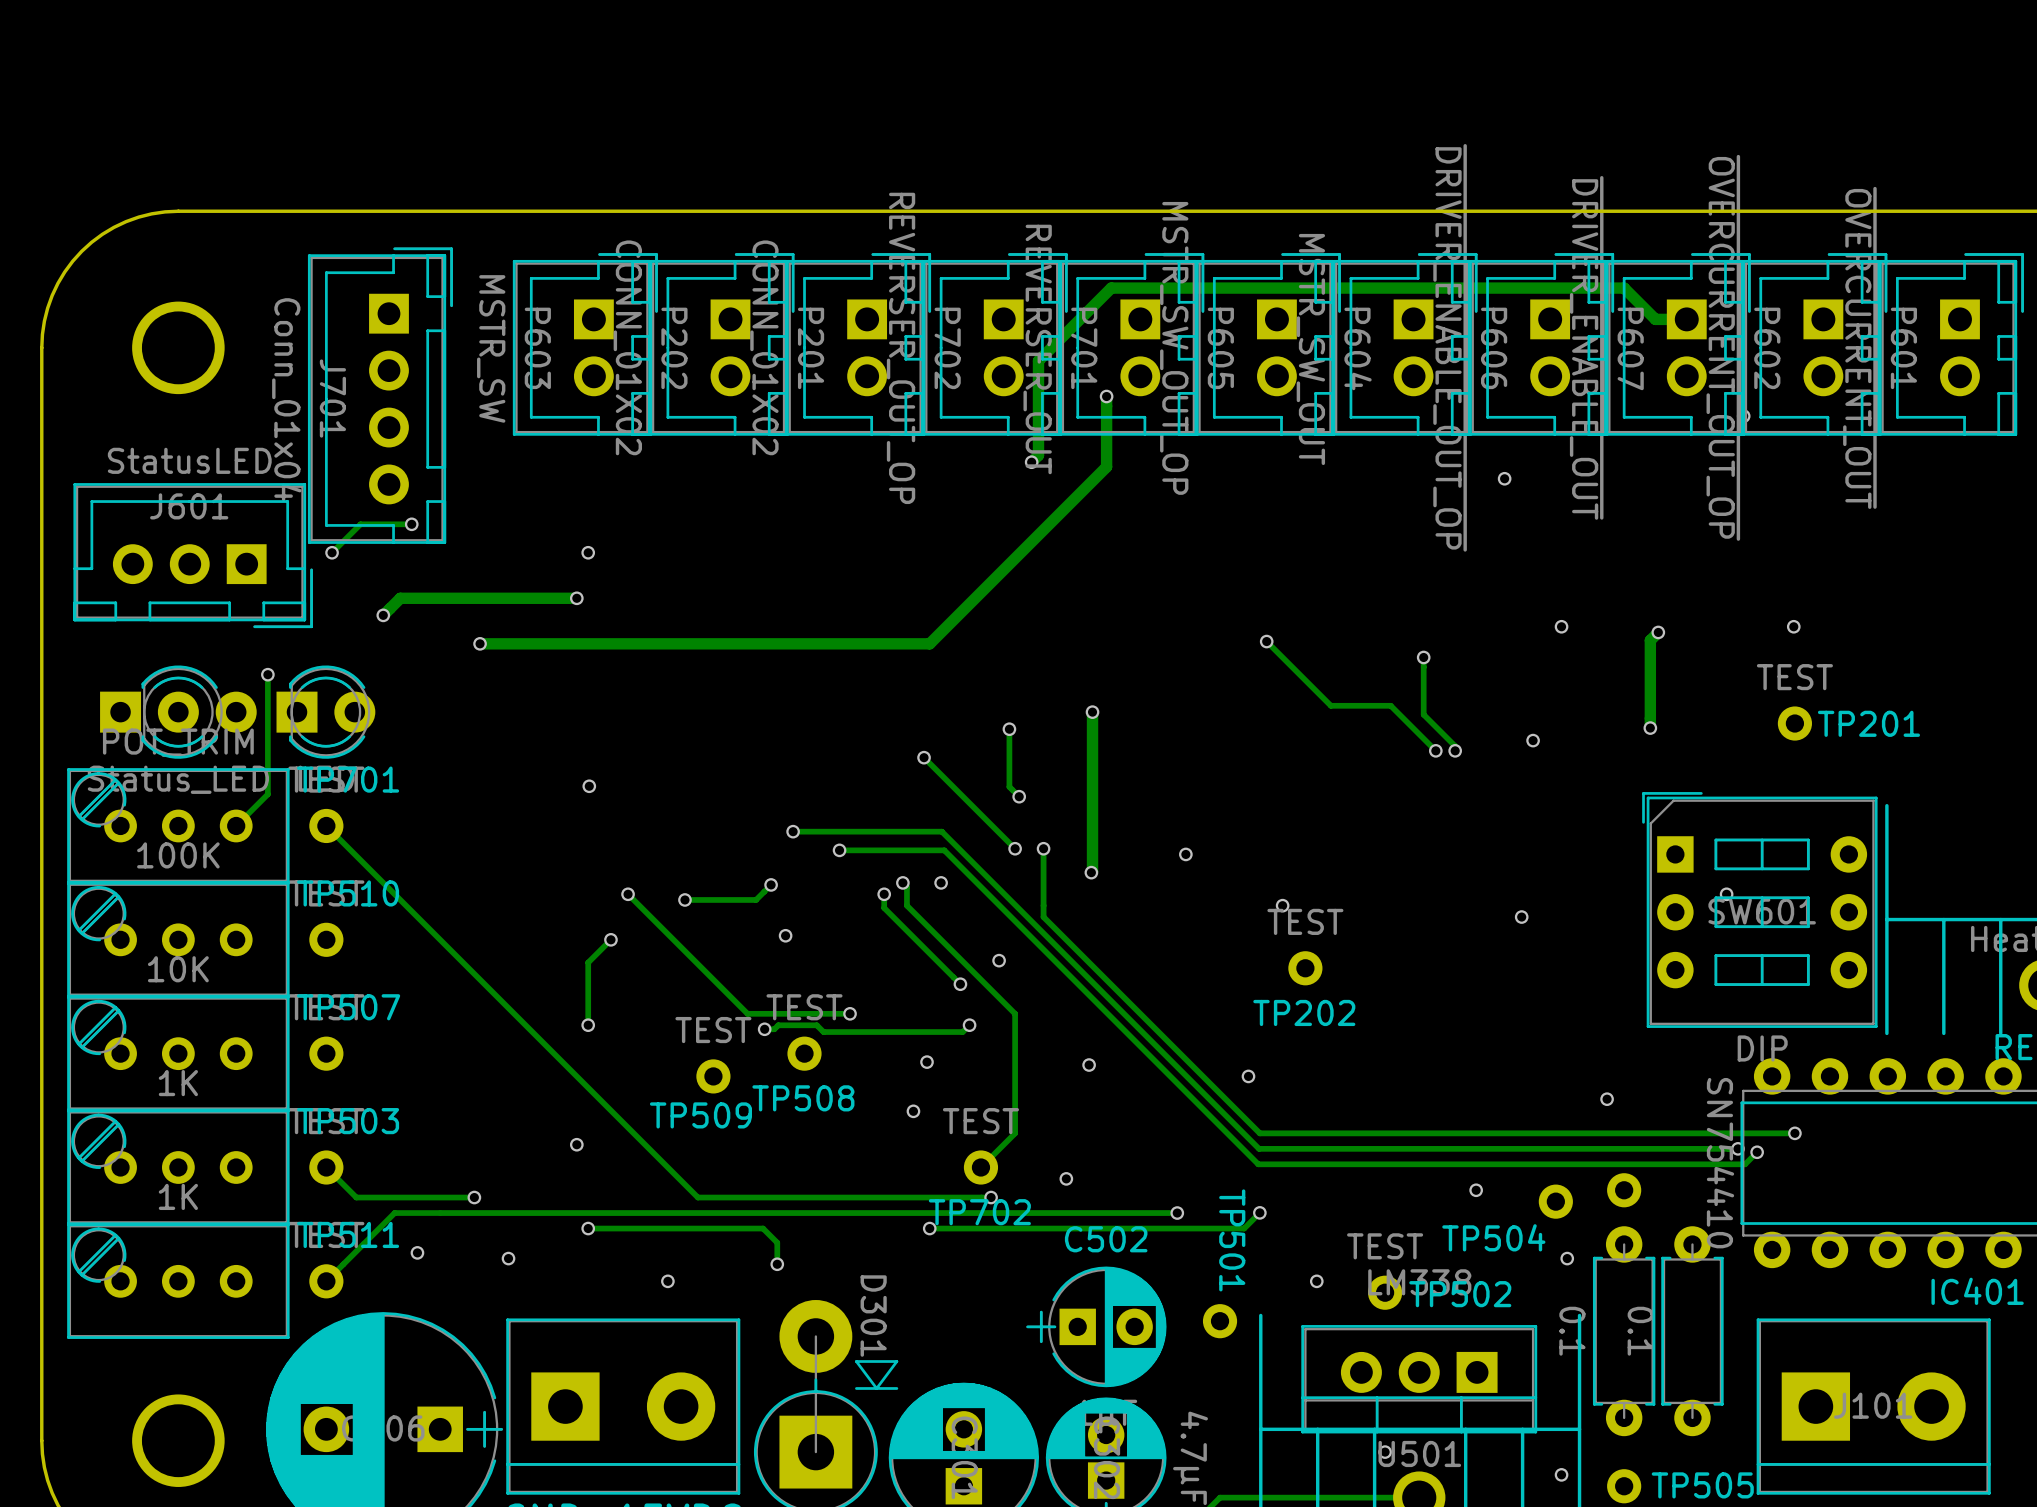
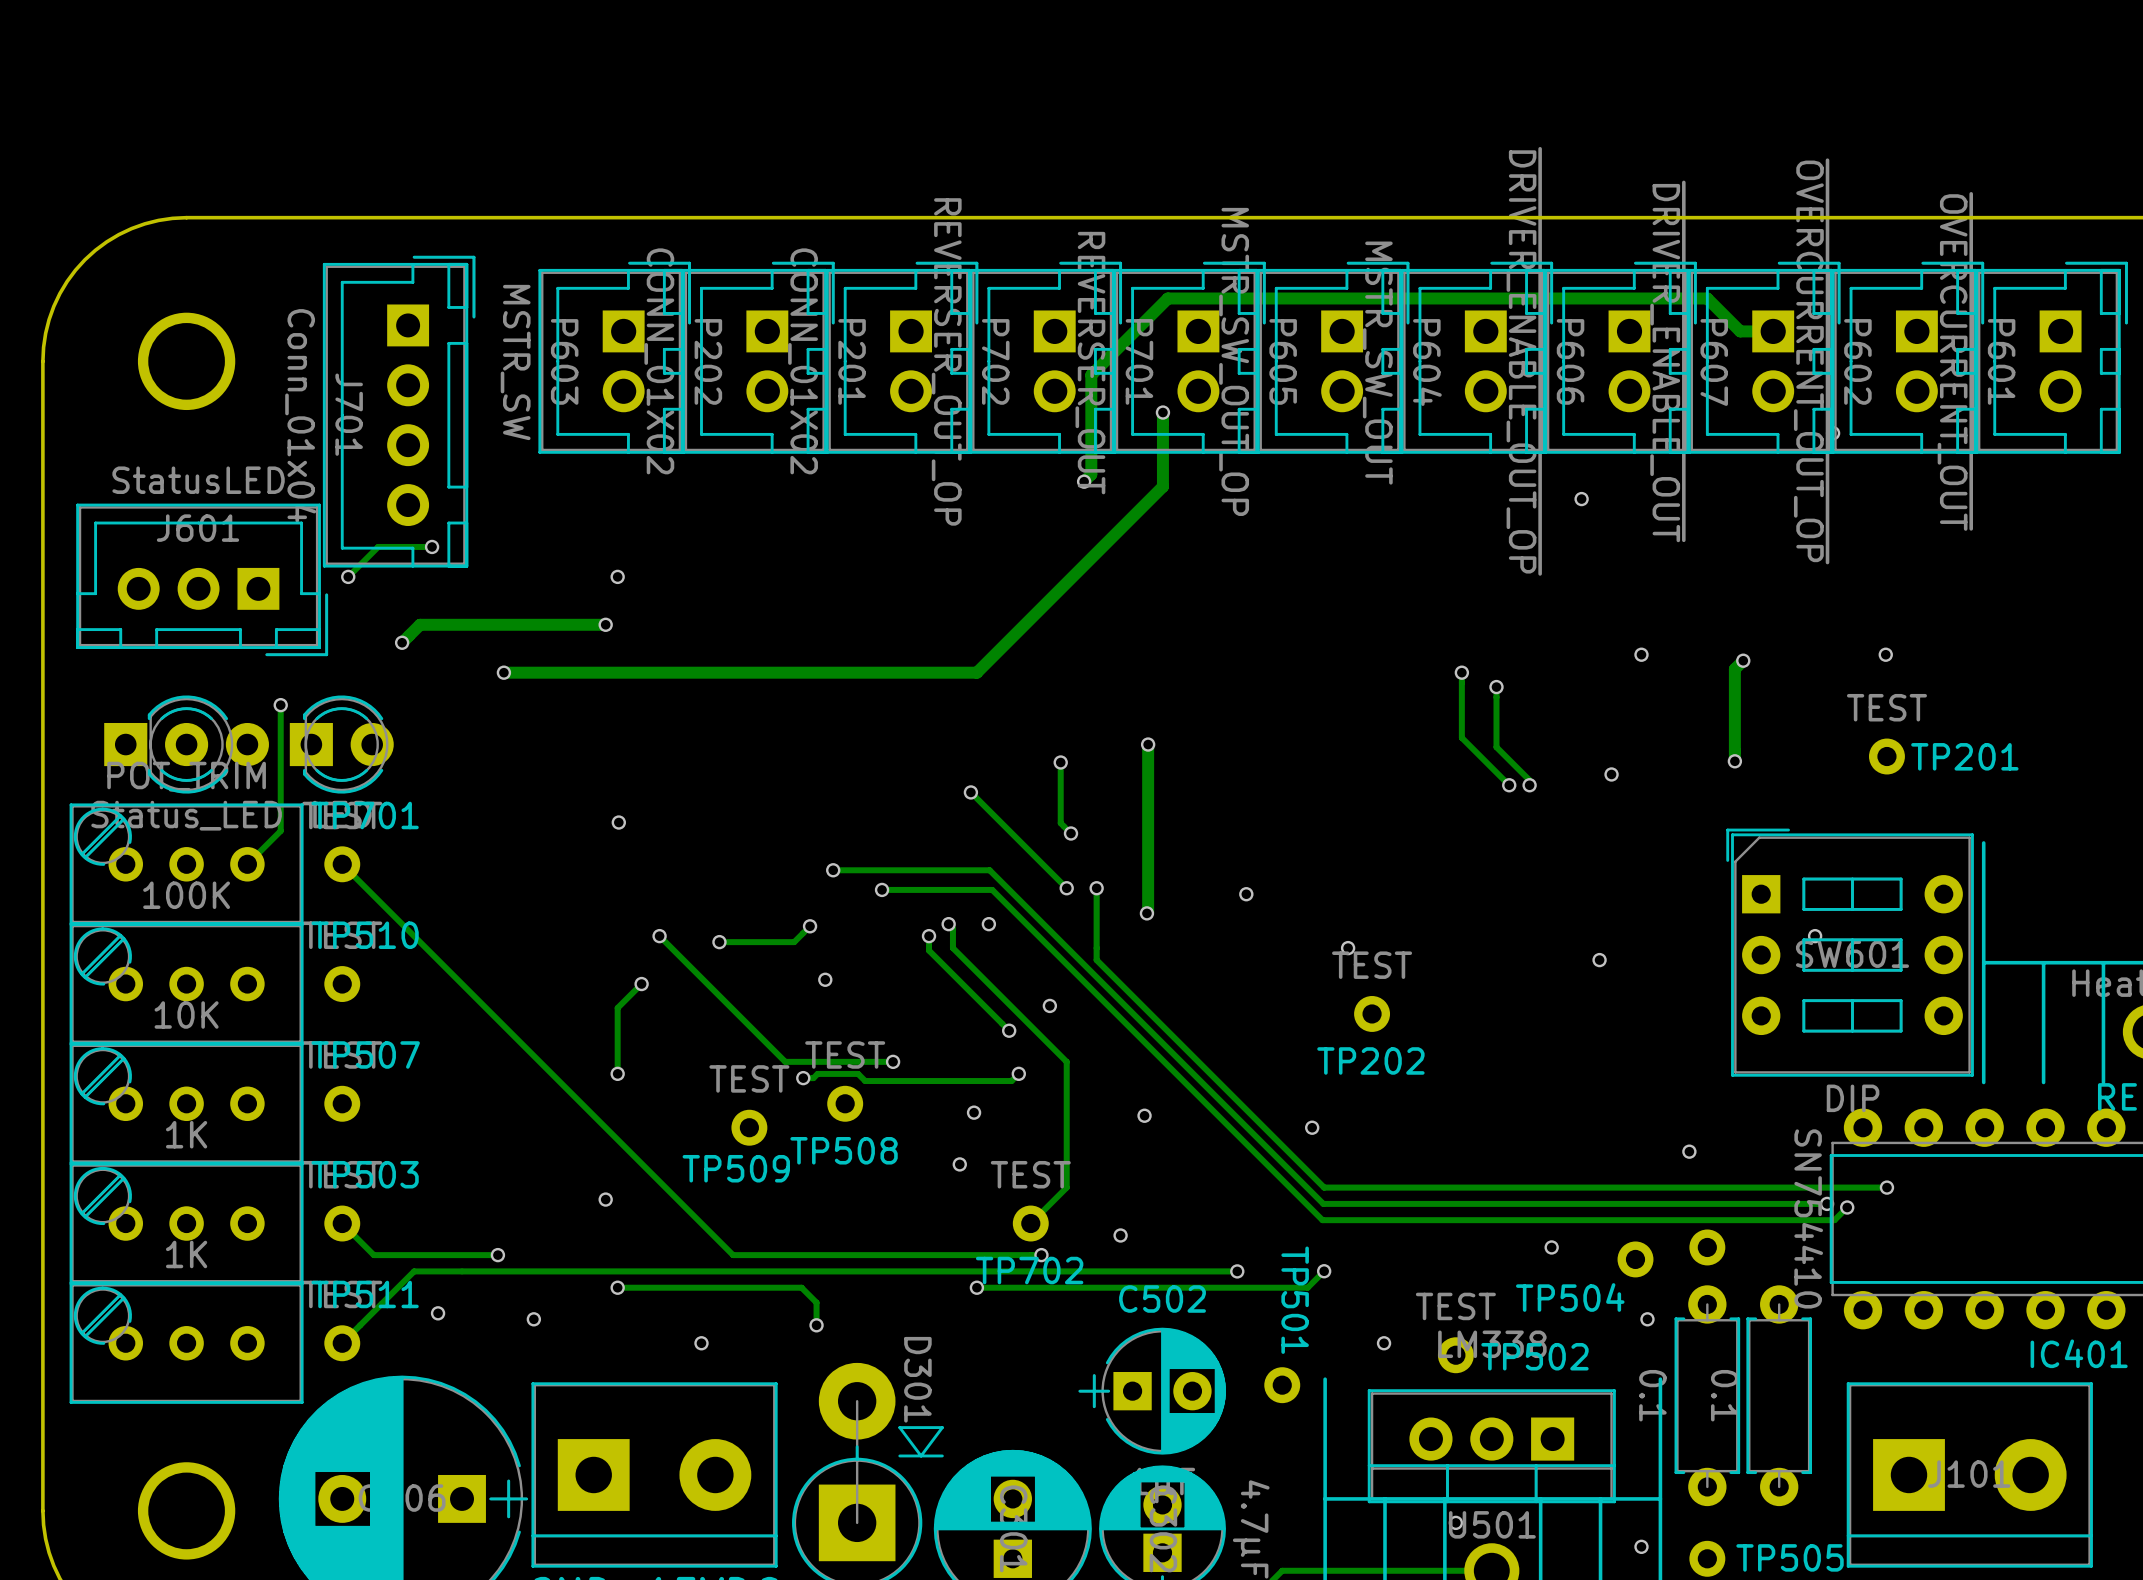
track: (1266, 641) (1330, 705) (1390, 705) -> (1461, 672) (1461, 737)
via position: (1266, 641) -> (1461, 672)

